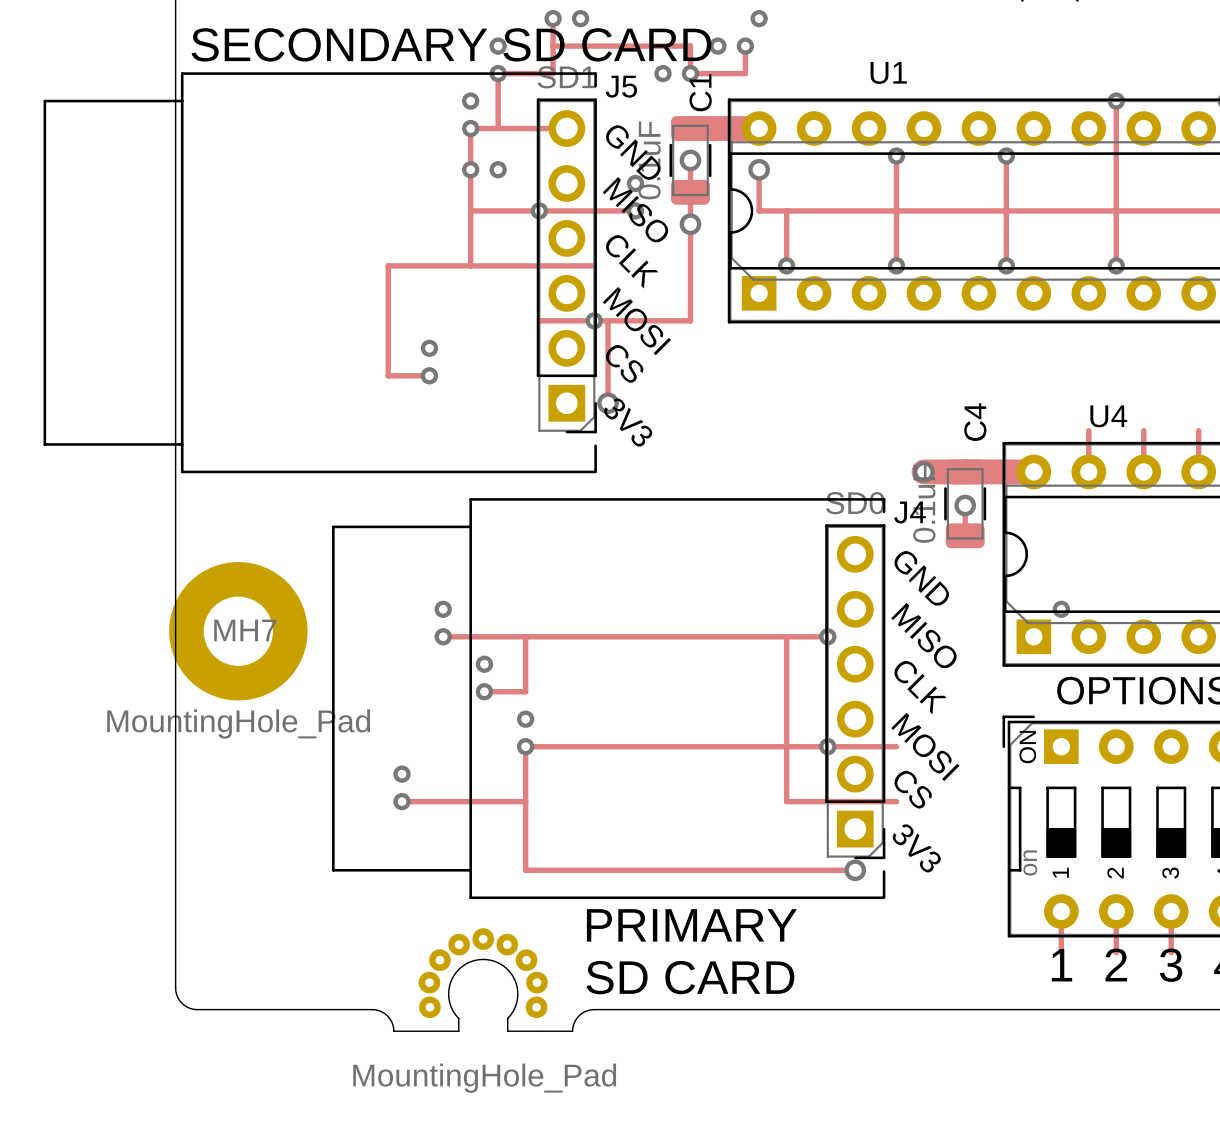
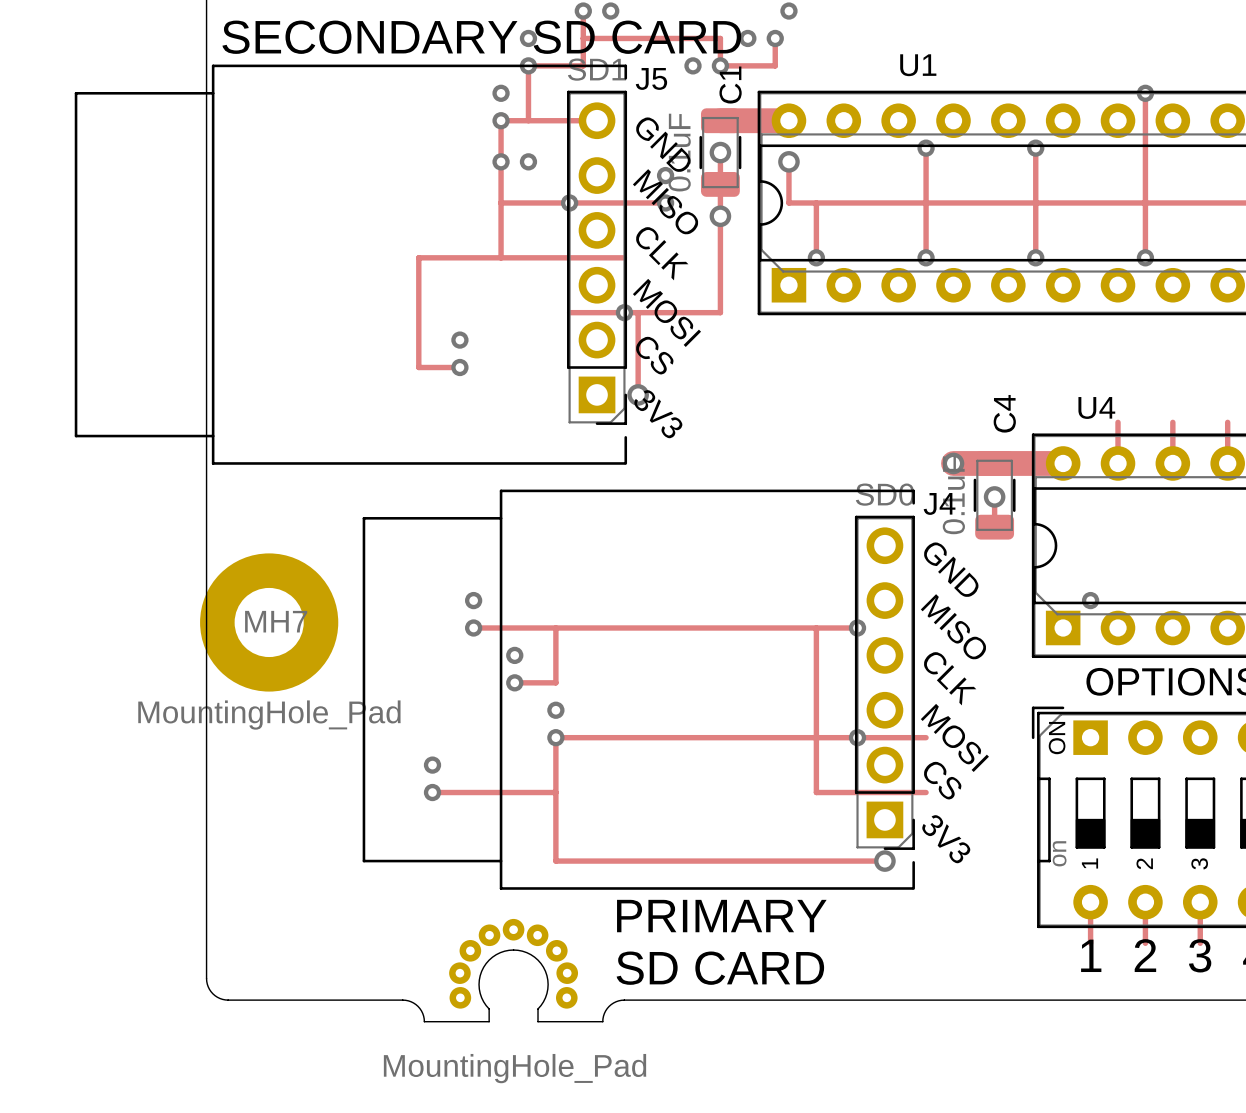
U4 name position: U4 (1108, 416) -> U4 (1096, 407)

